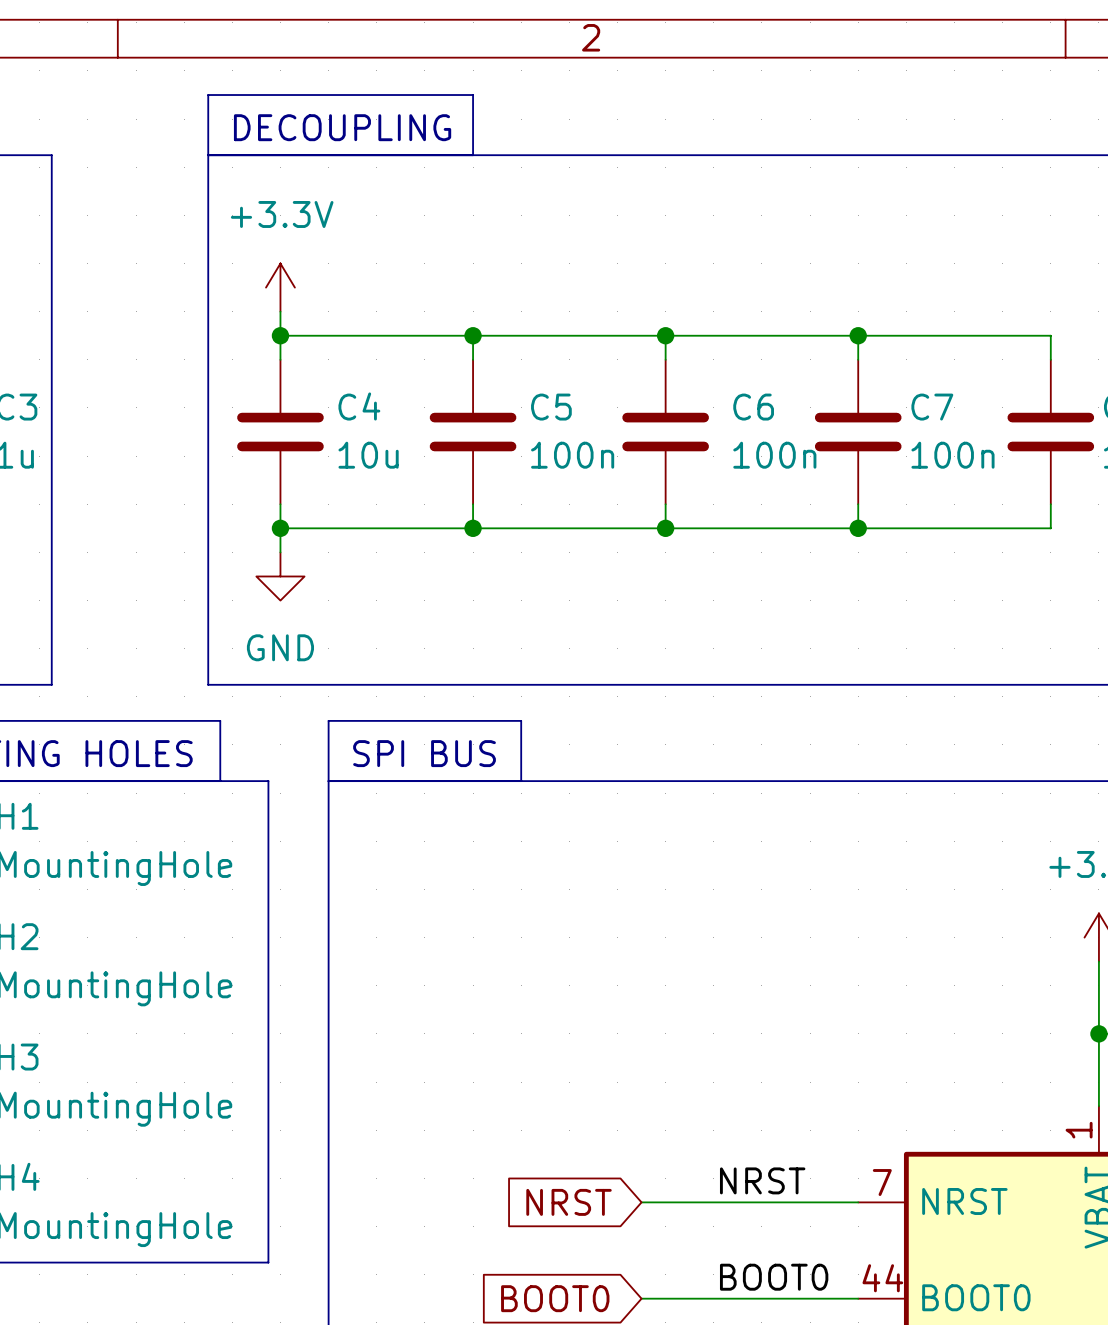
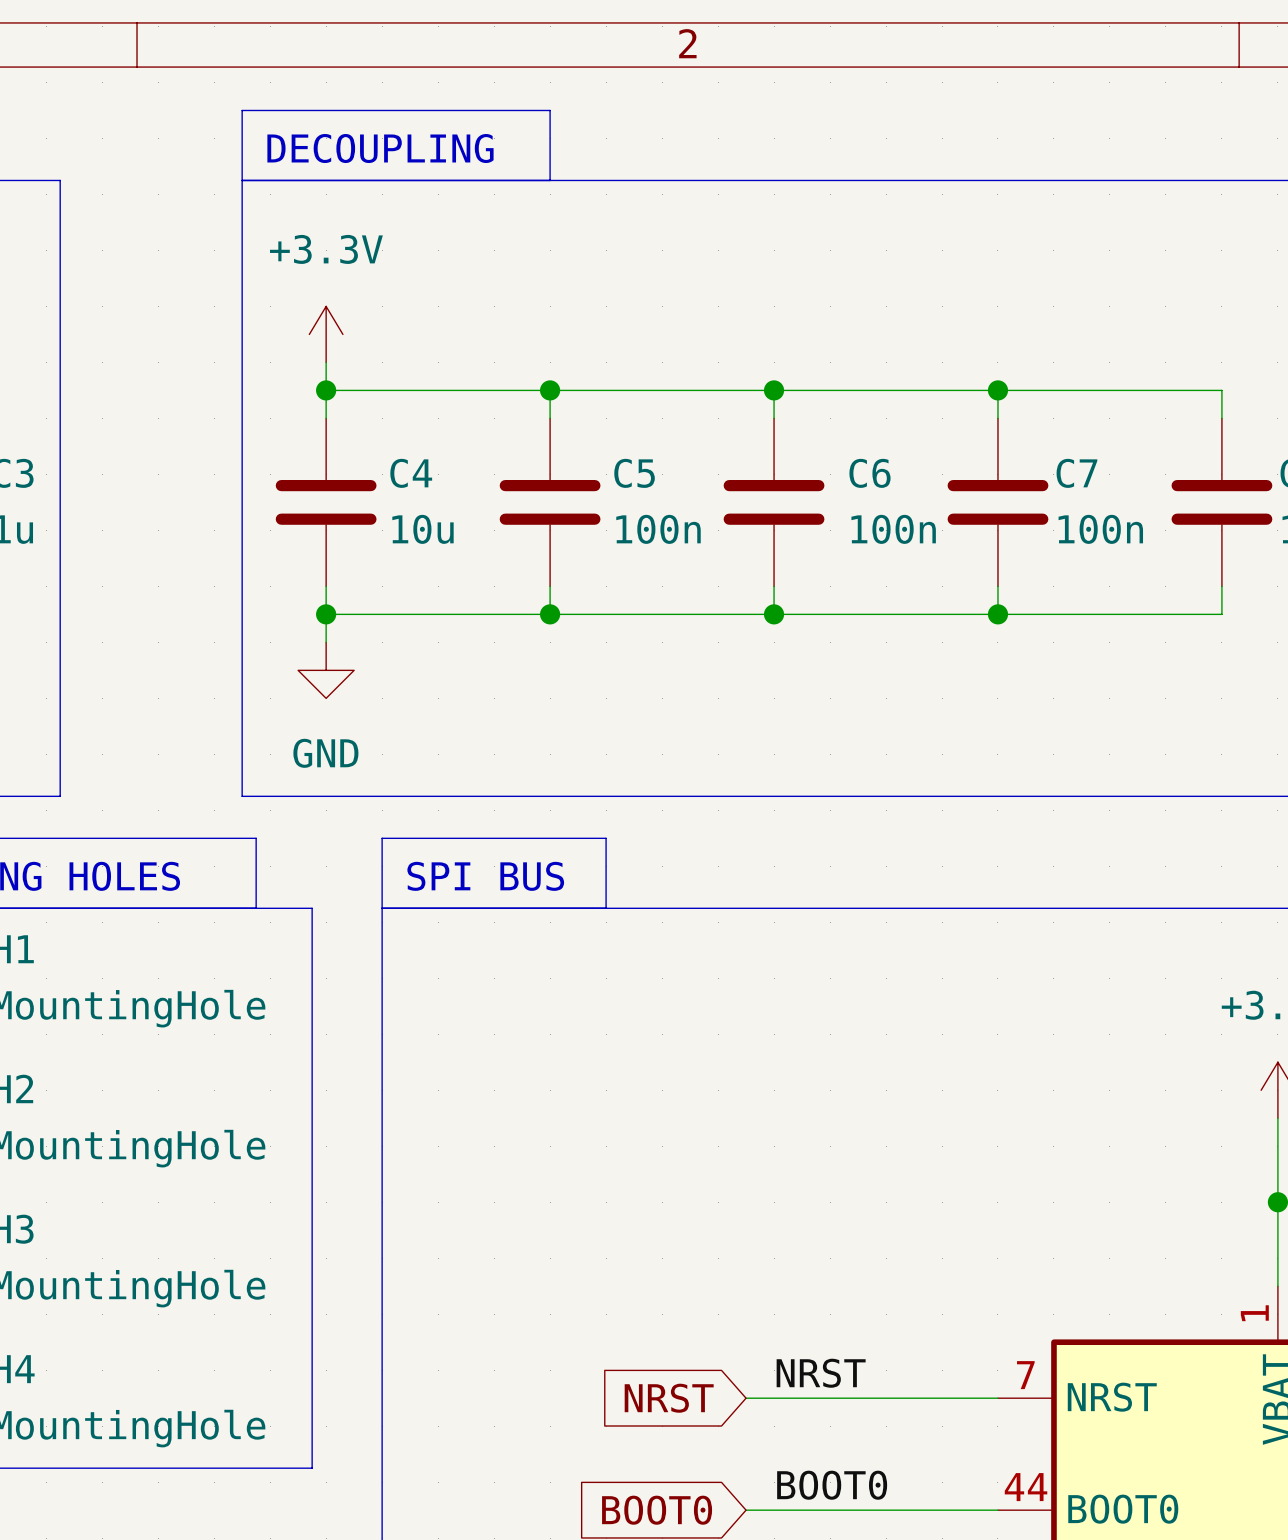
label position: NRST (762, 1180) -> NRST (821, 1373)
label position: BOOT0 (774, 1277) -> BOOT0 (832, 1485)

